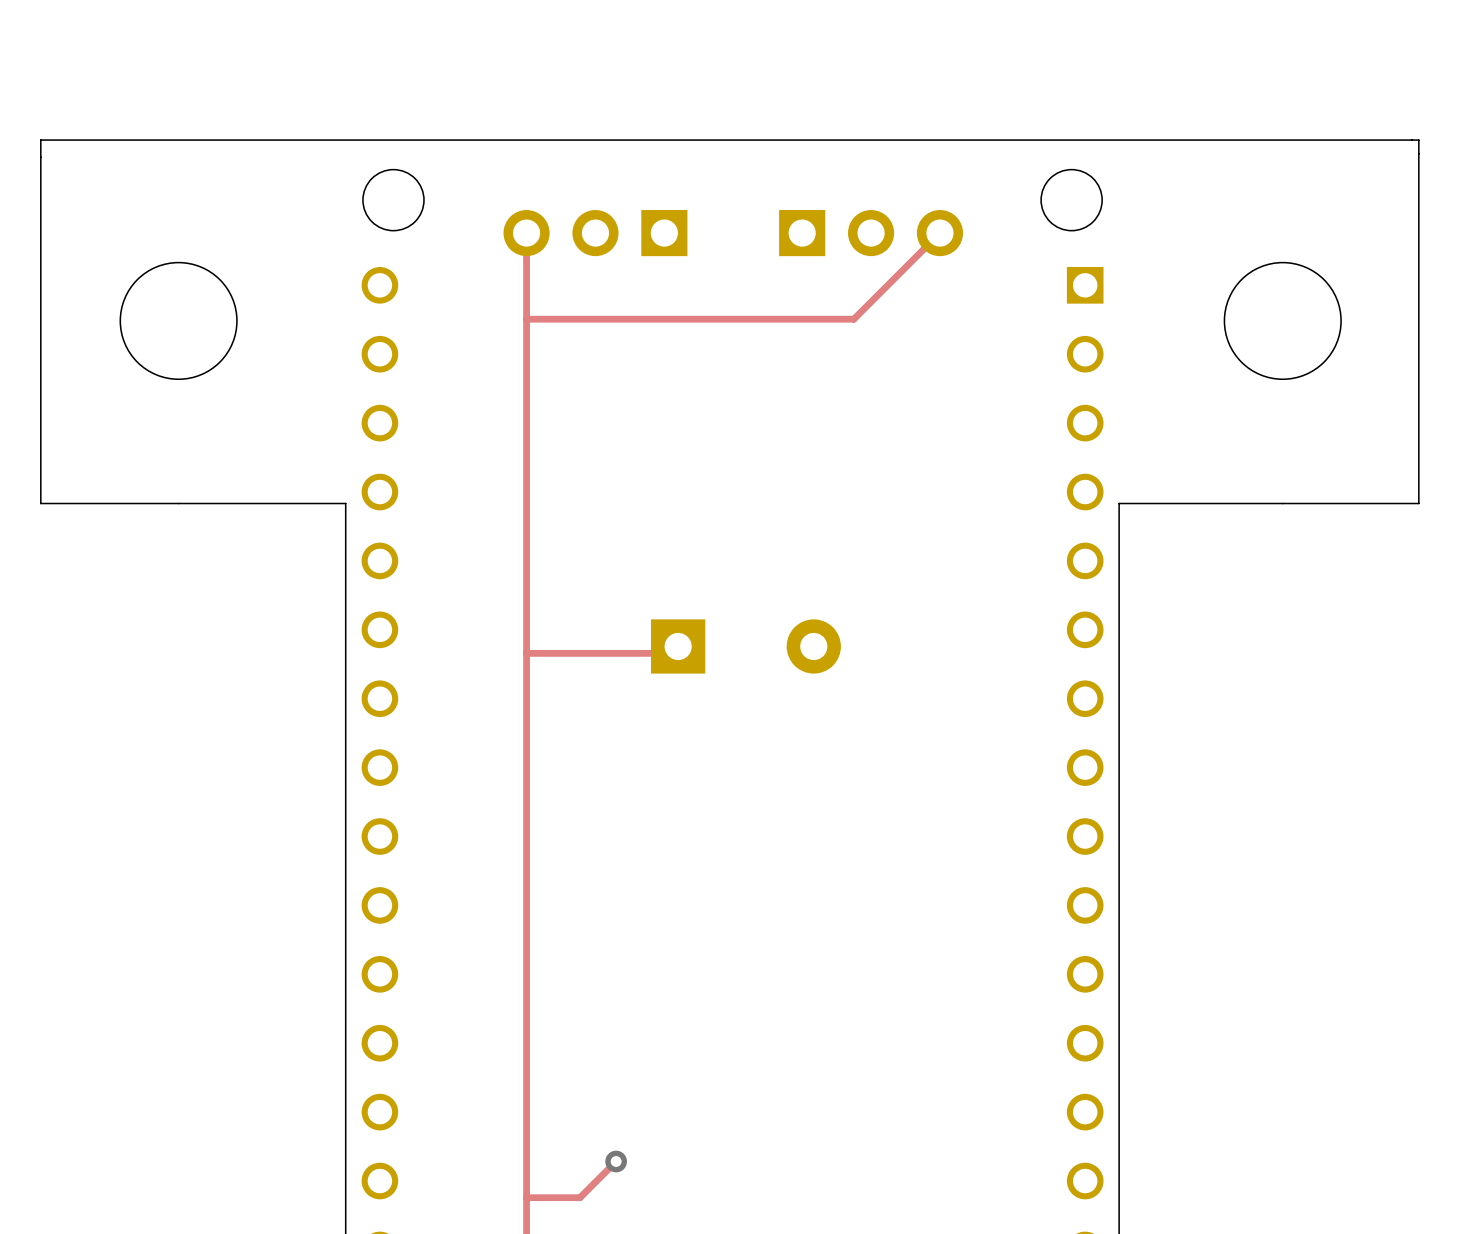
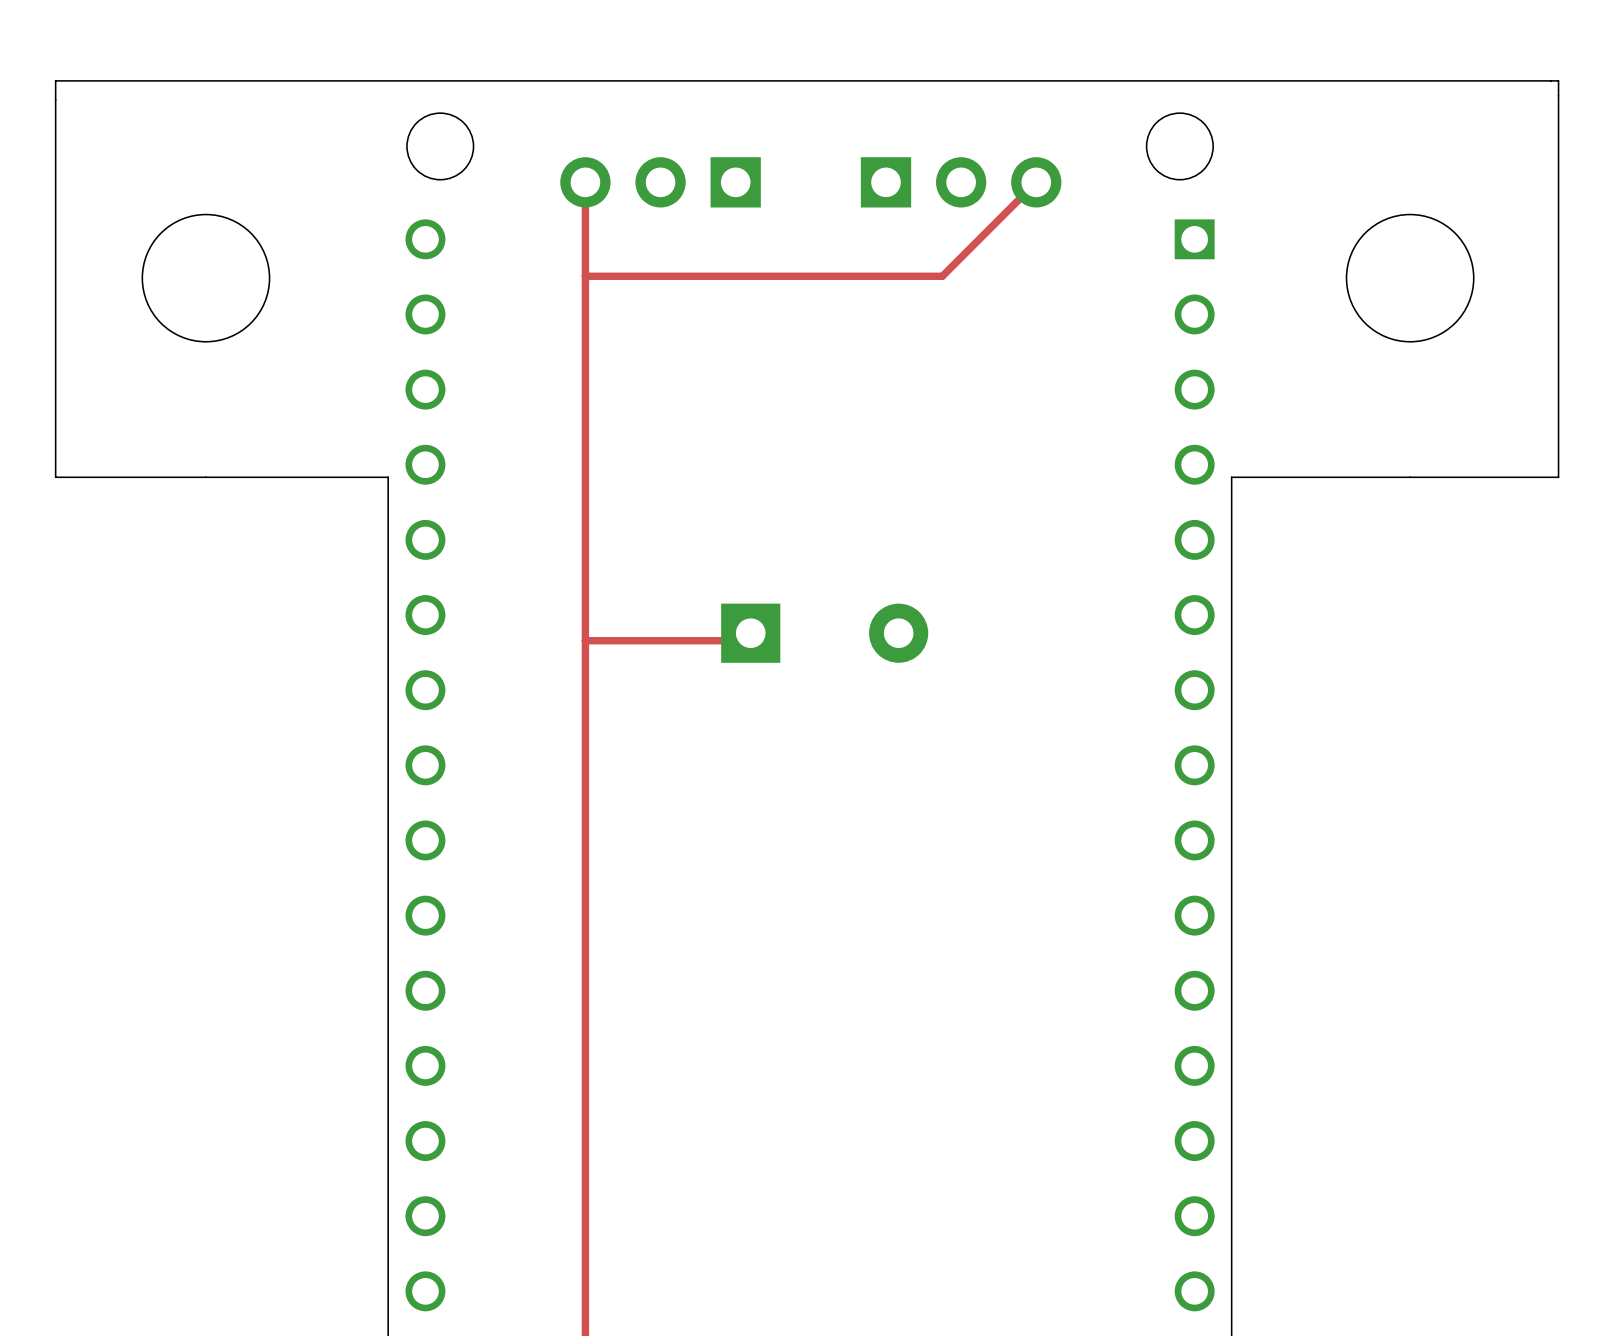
track: (616, 1161) (579, 1197) (526, 1197) -> none
via: (616, 1161) -> none

